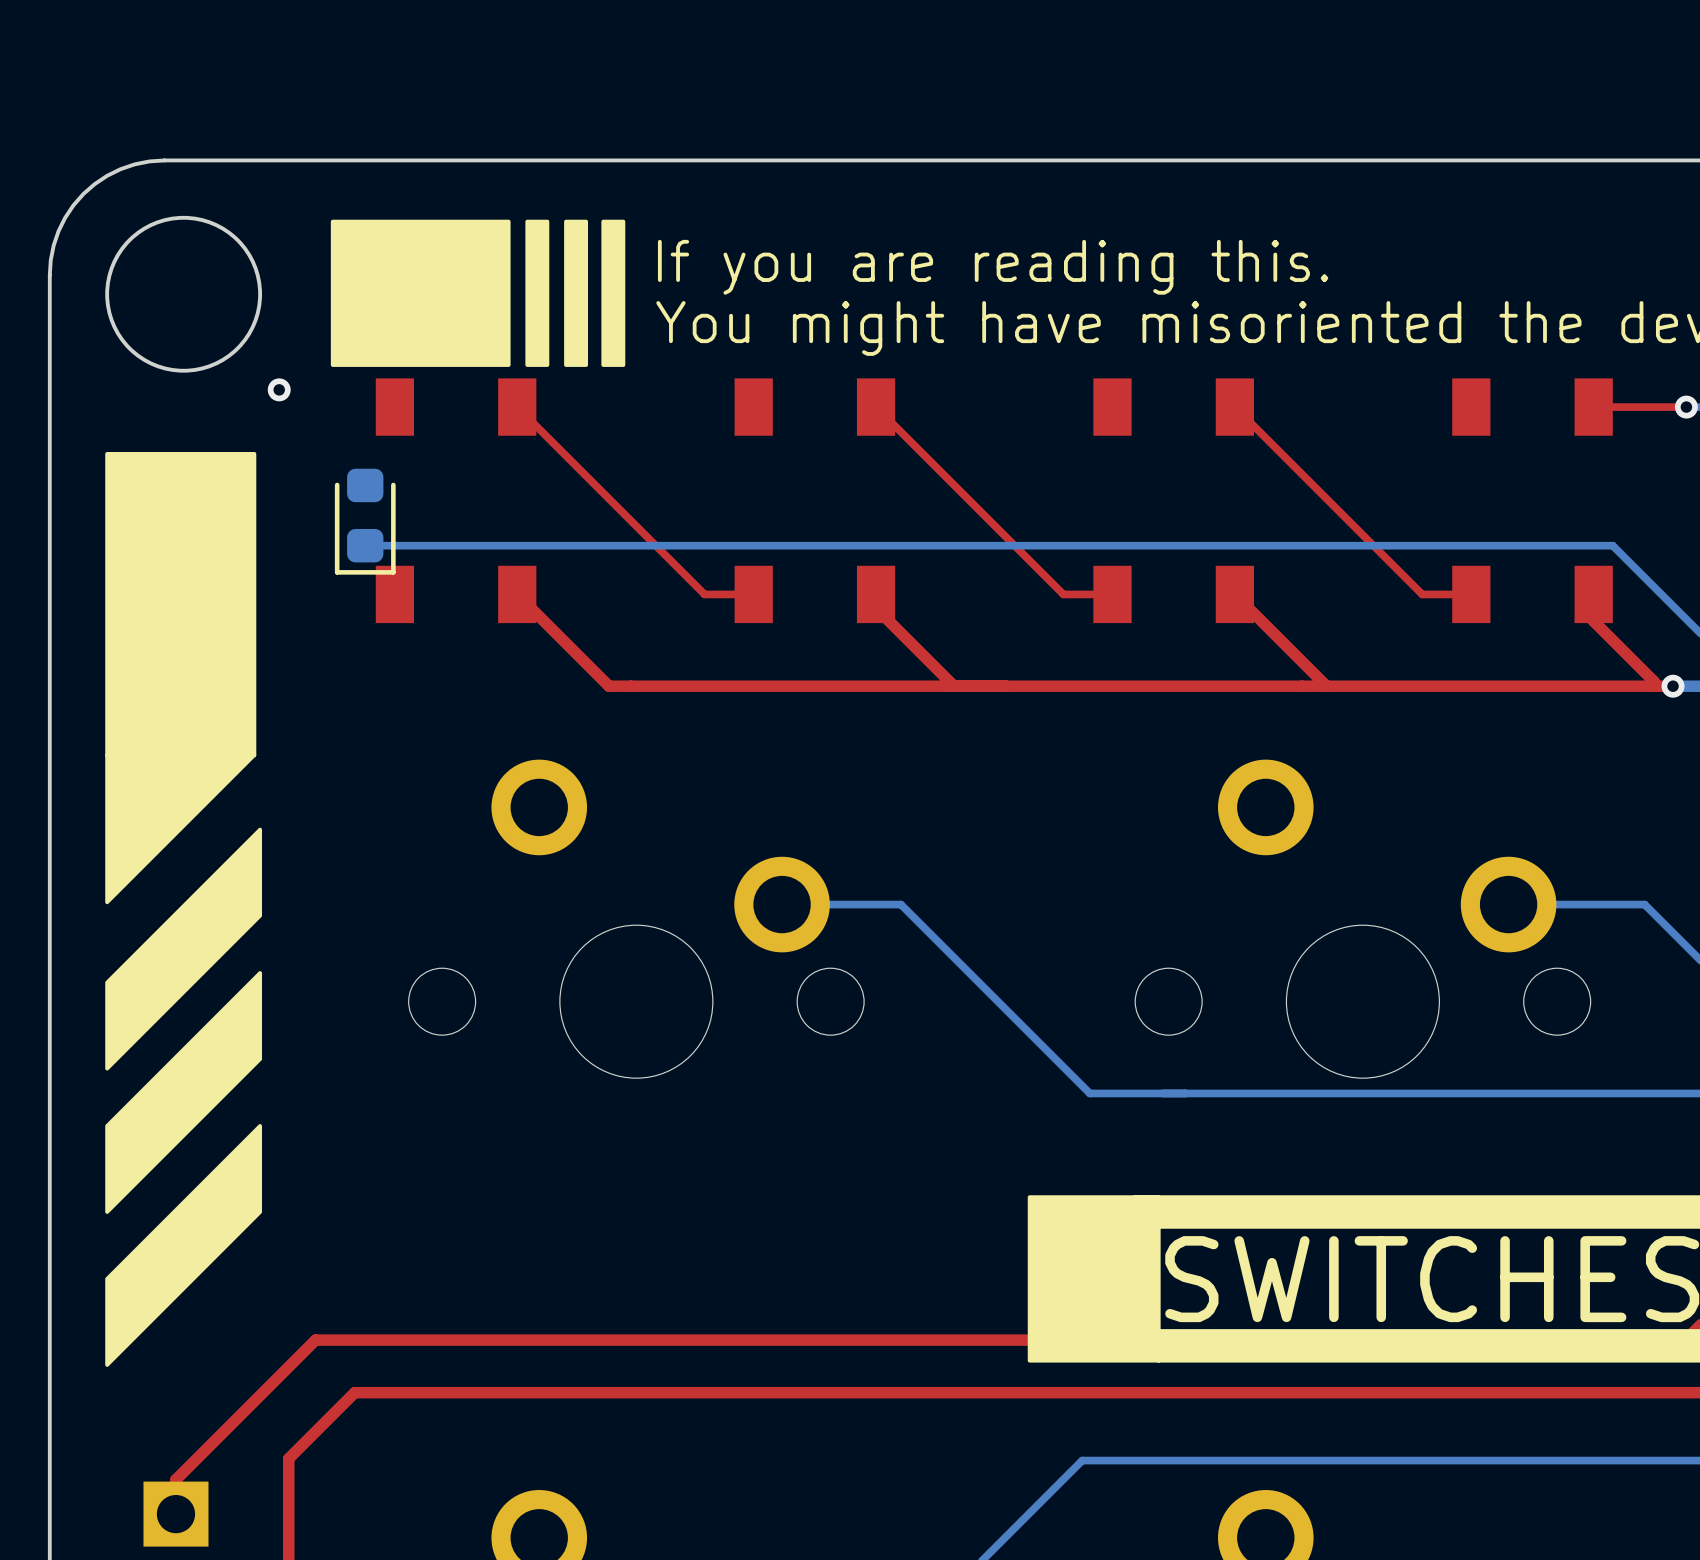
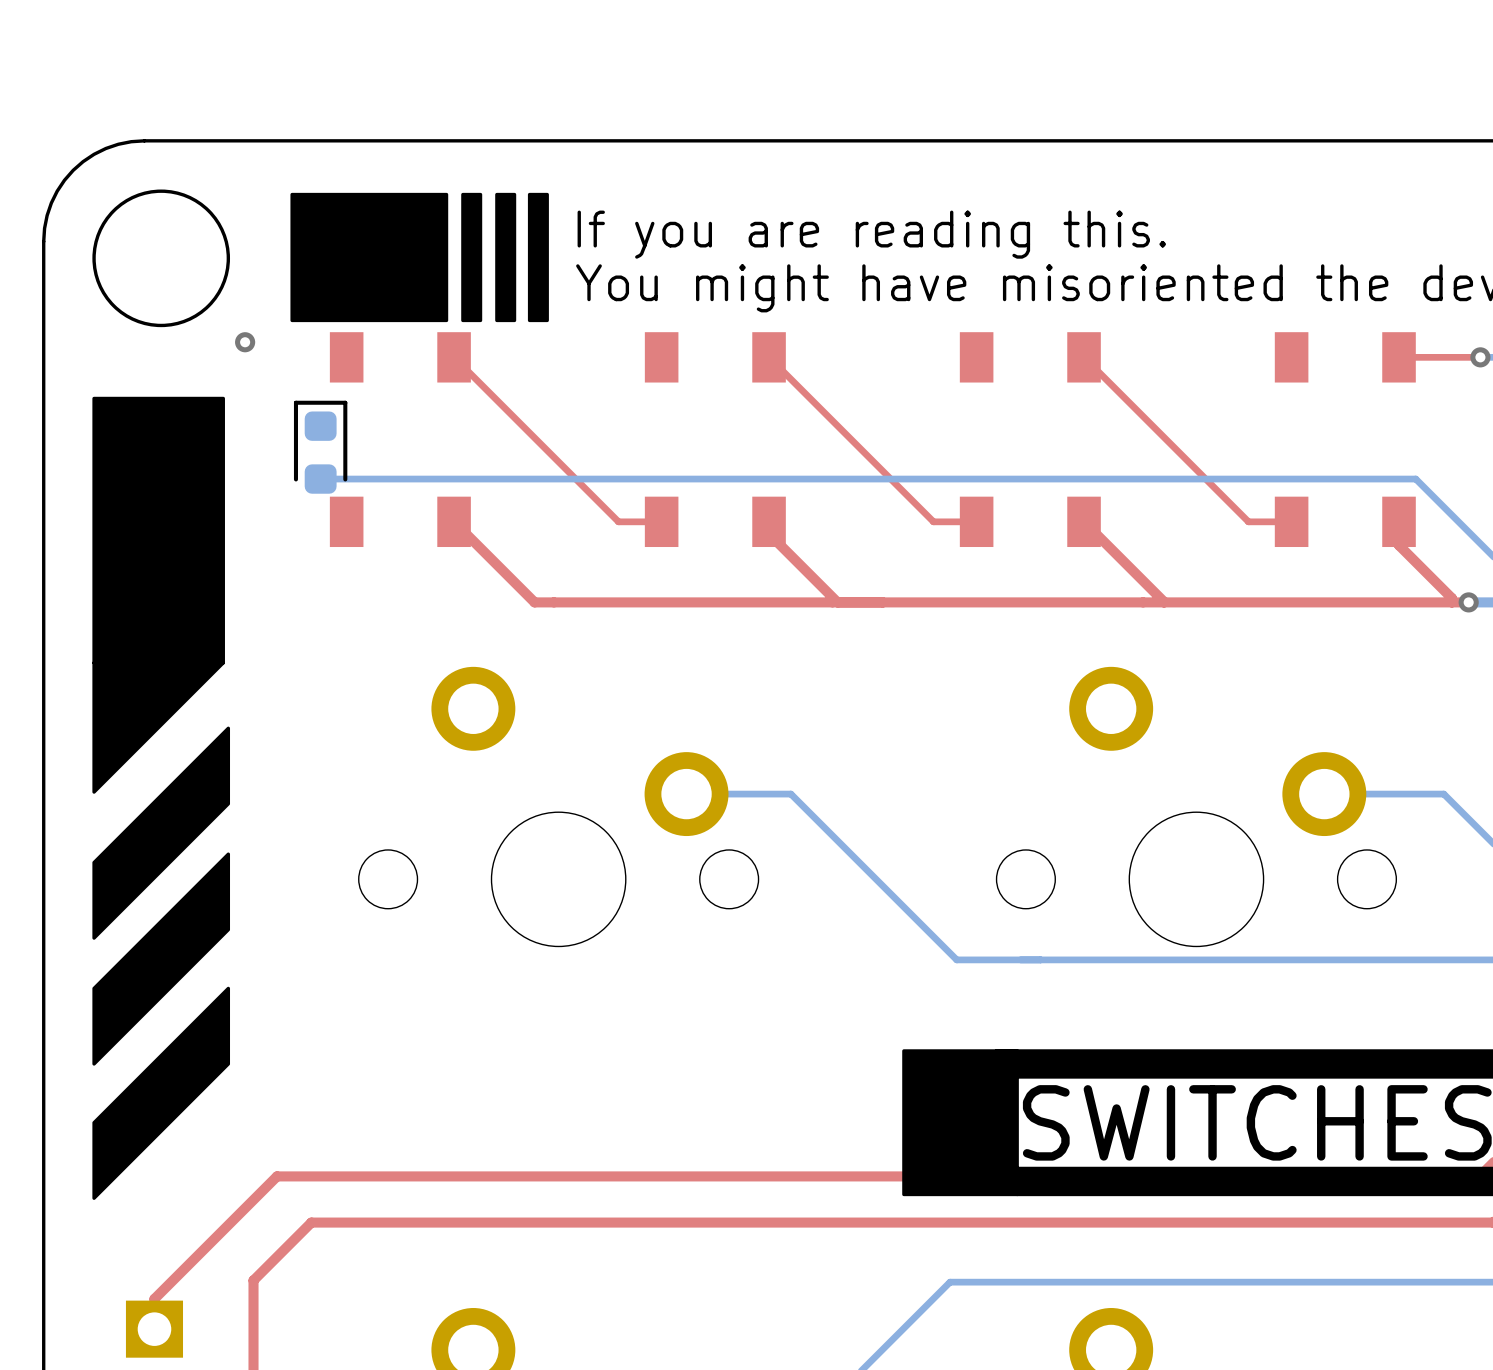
part rotation: 0° (365, 521) -> 180° (320, 447)

